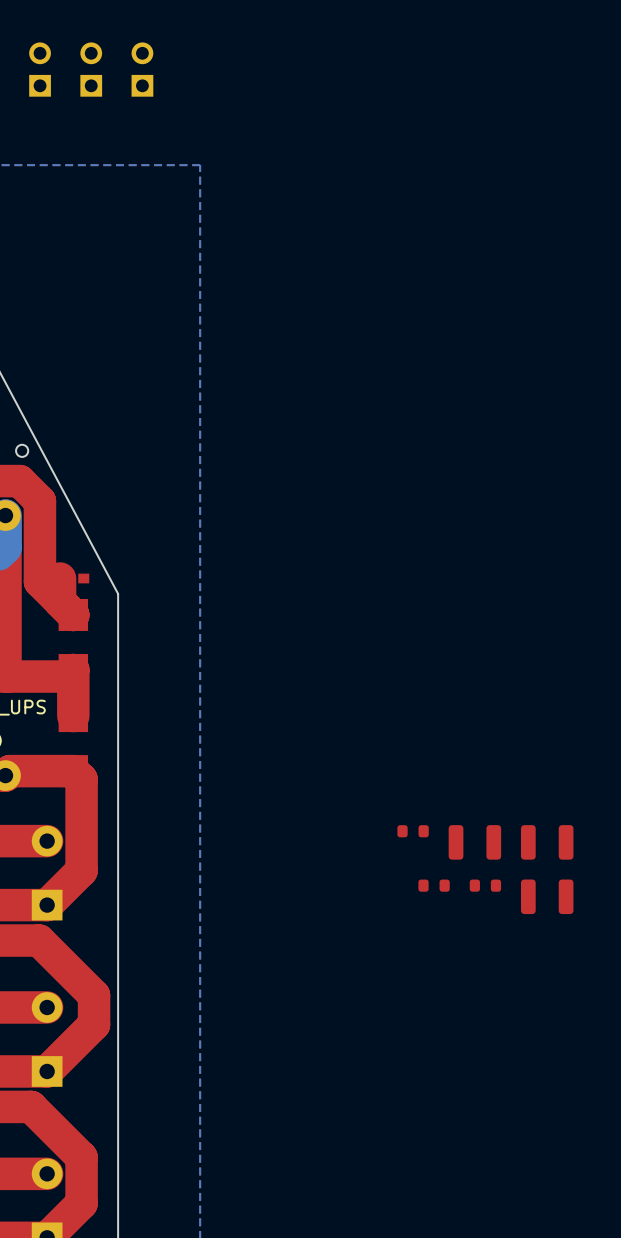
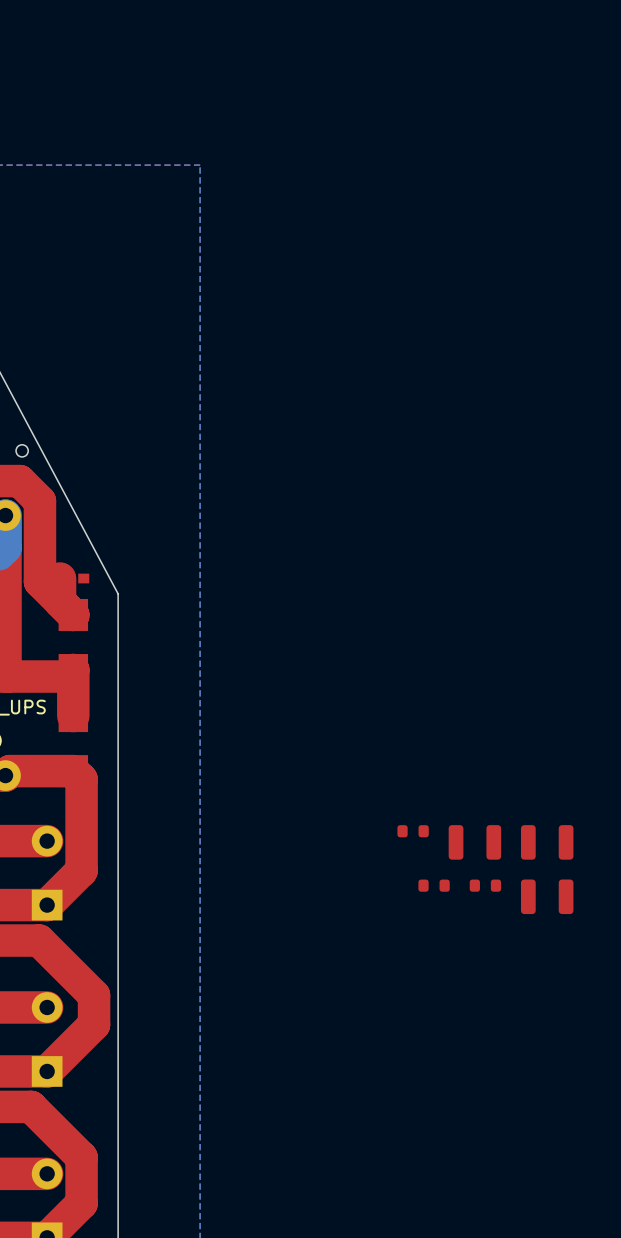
part: (40, 69) -> none
part: (91, 69) -> none
part: (142, 69) -> none

